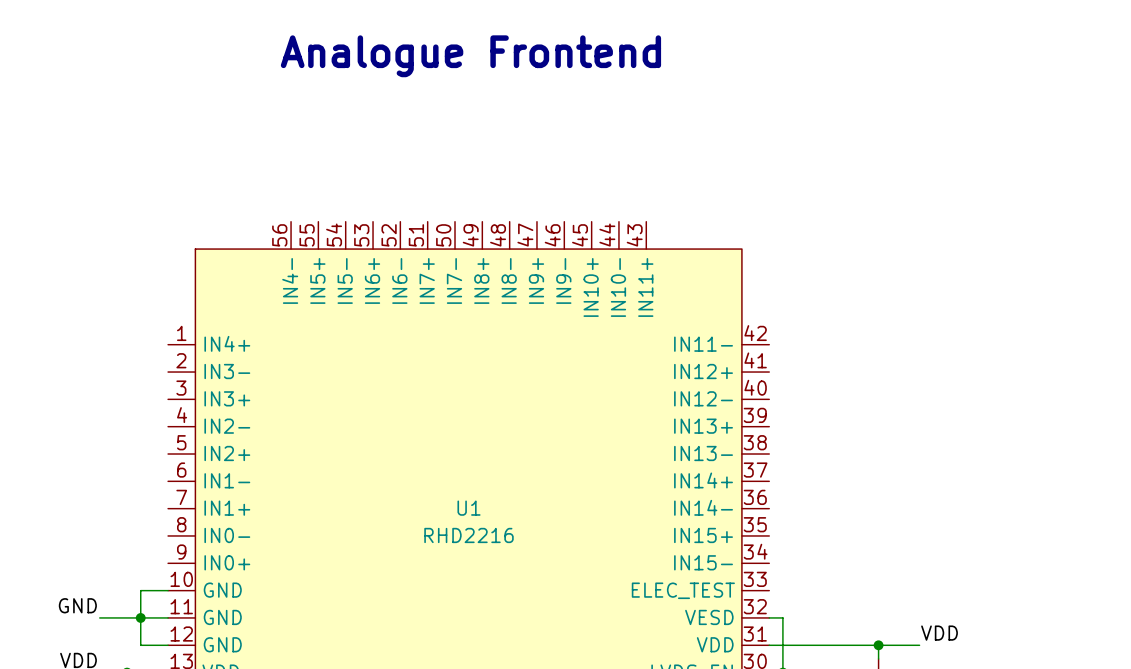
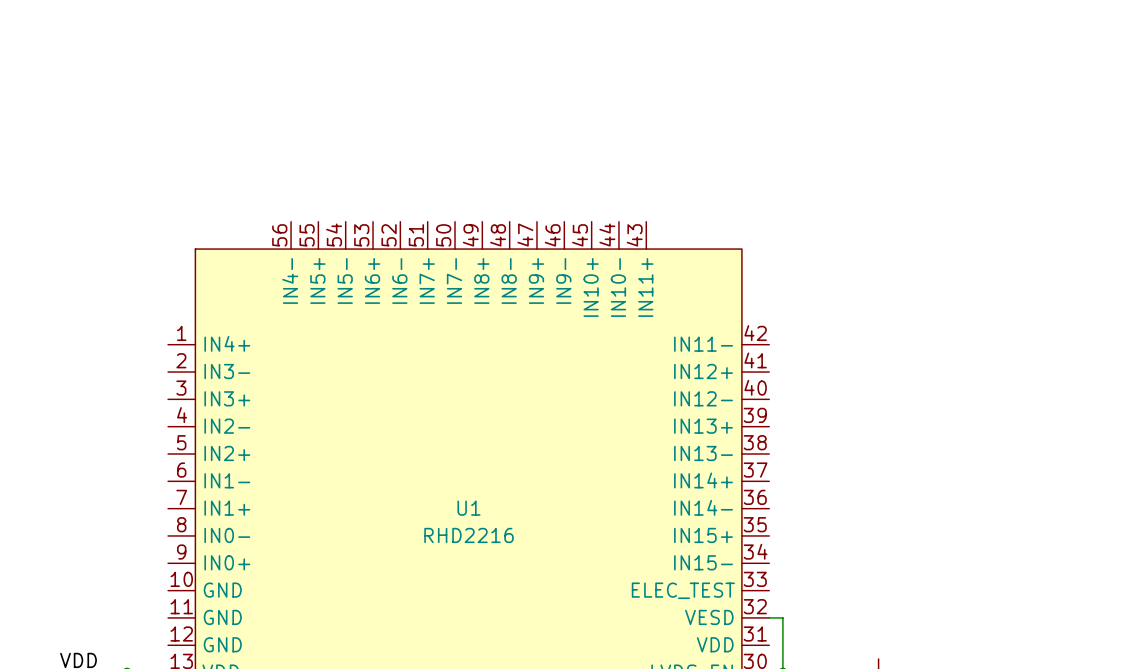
text: Analogue Frontend (470, 56) -> none
wire: (168, 590) (140, 590) (140, 645) (168, 645) -> none
label: GND (77, 605) -> none
wire: (99, 617) (168, 617) -> none
junction: (140, 617) -> none
label: VDD (939, 633) -> none
wire: (769, 645) (919, 645) -> none
wire: (878, 645) (878, 658) -> none
junction: (878, 645) -> none

